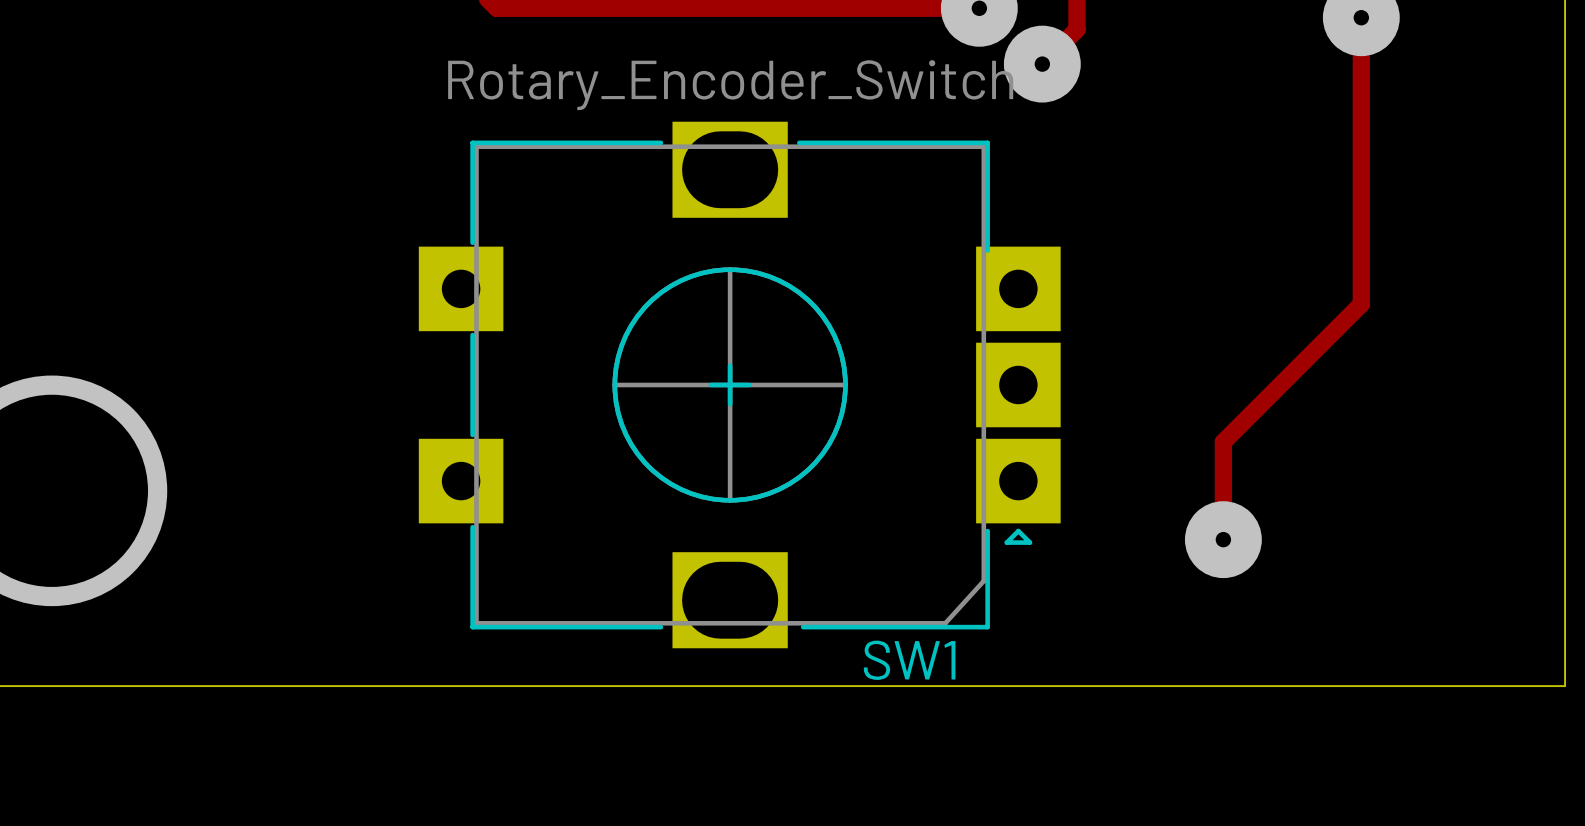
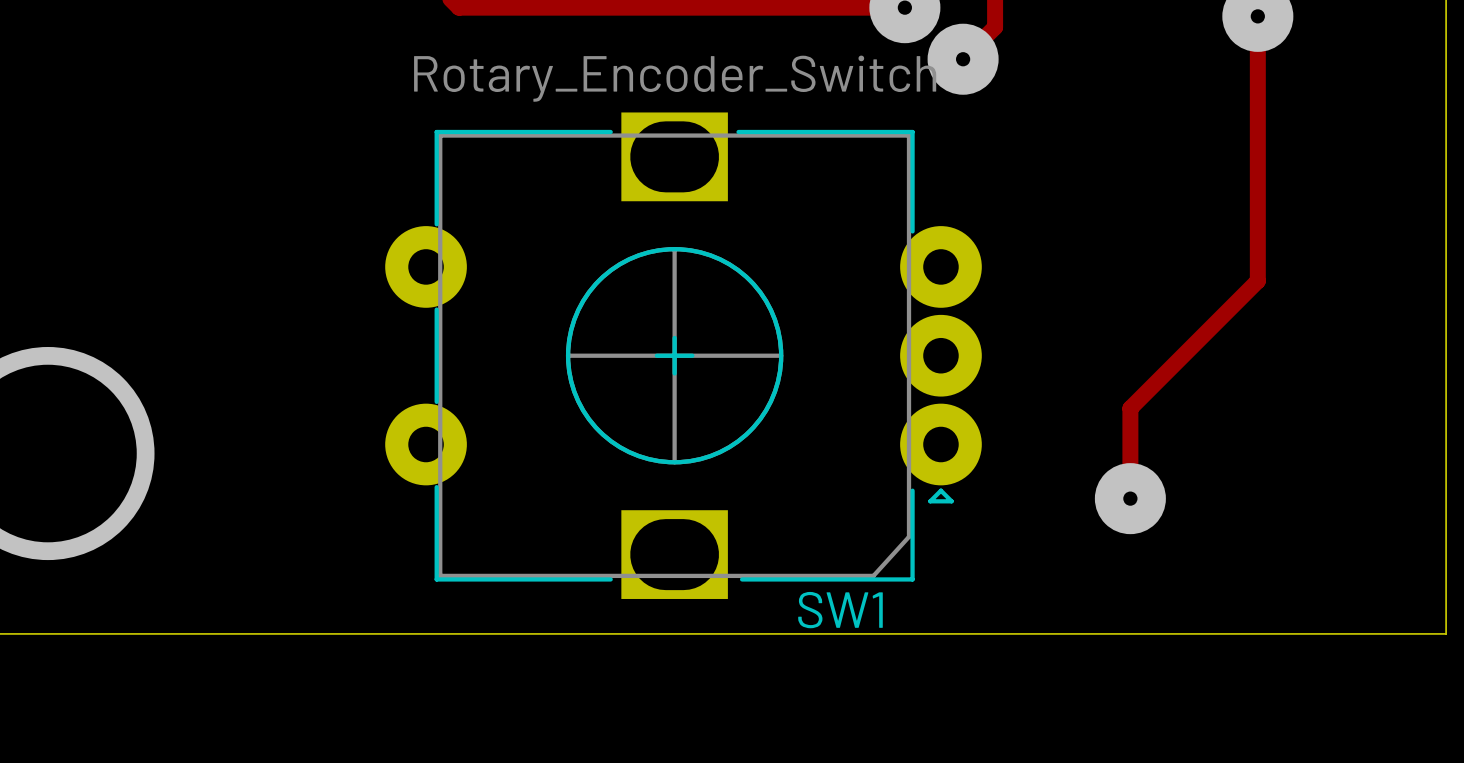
SW1 footprint: [418, 121, 1061, 649] -> [385, 112, 982, 599]

